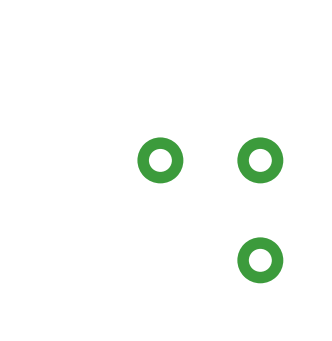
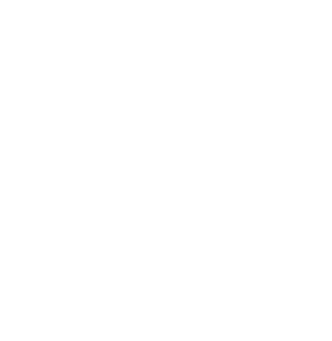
part: (160, 160) -> none
part: (260, 160) -> none
part: (260, 260) -> none

